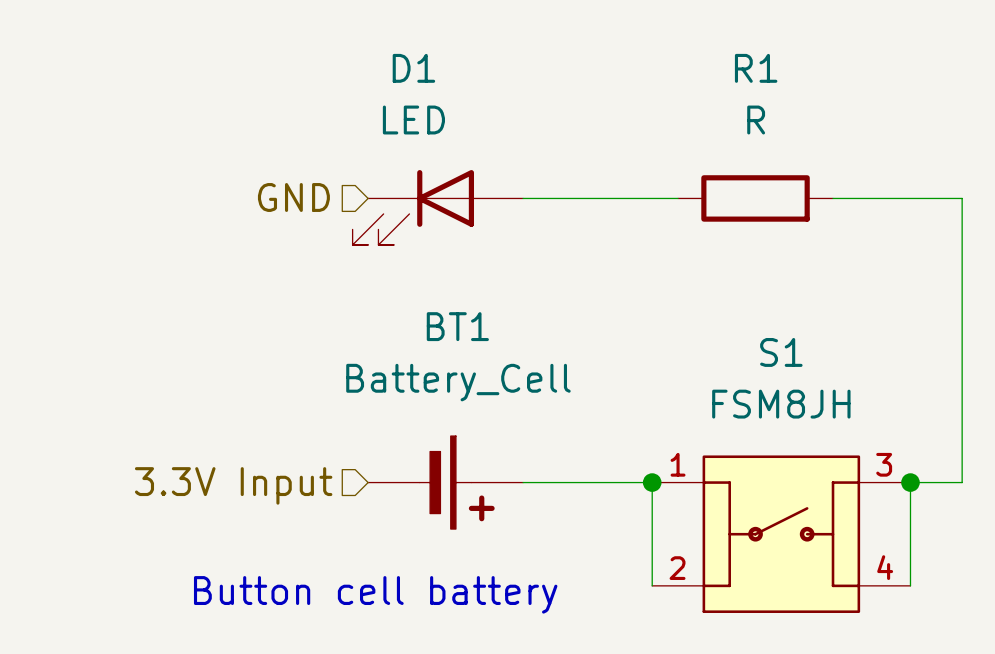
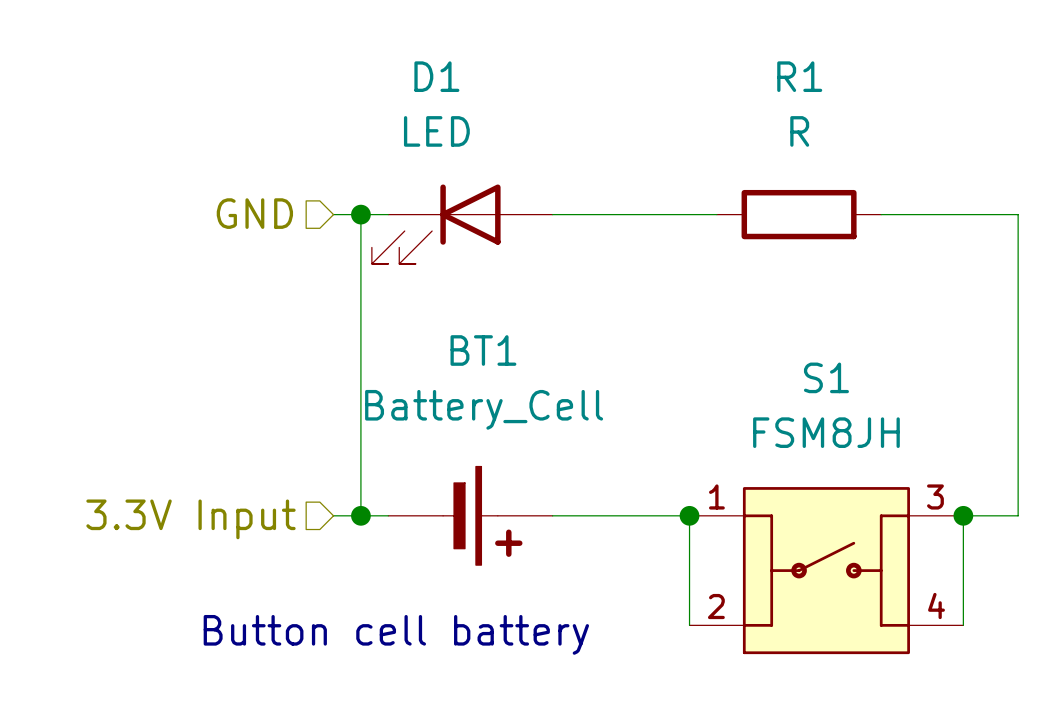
hierarchical label position: GND (293, 197) -> GND (254, 213)
wire: none -> (333, 214) (388, 214)
wire: none -> (360, 214) (360, 515)
junction: none -> (360, 214)
wire: none -> (333, 515) (388, 515)
junction: none -> (360, 515)
hierarchical label position: 3.3V Input (233, 485) -> 3.3V Input (190, 519)

